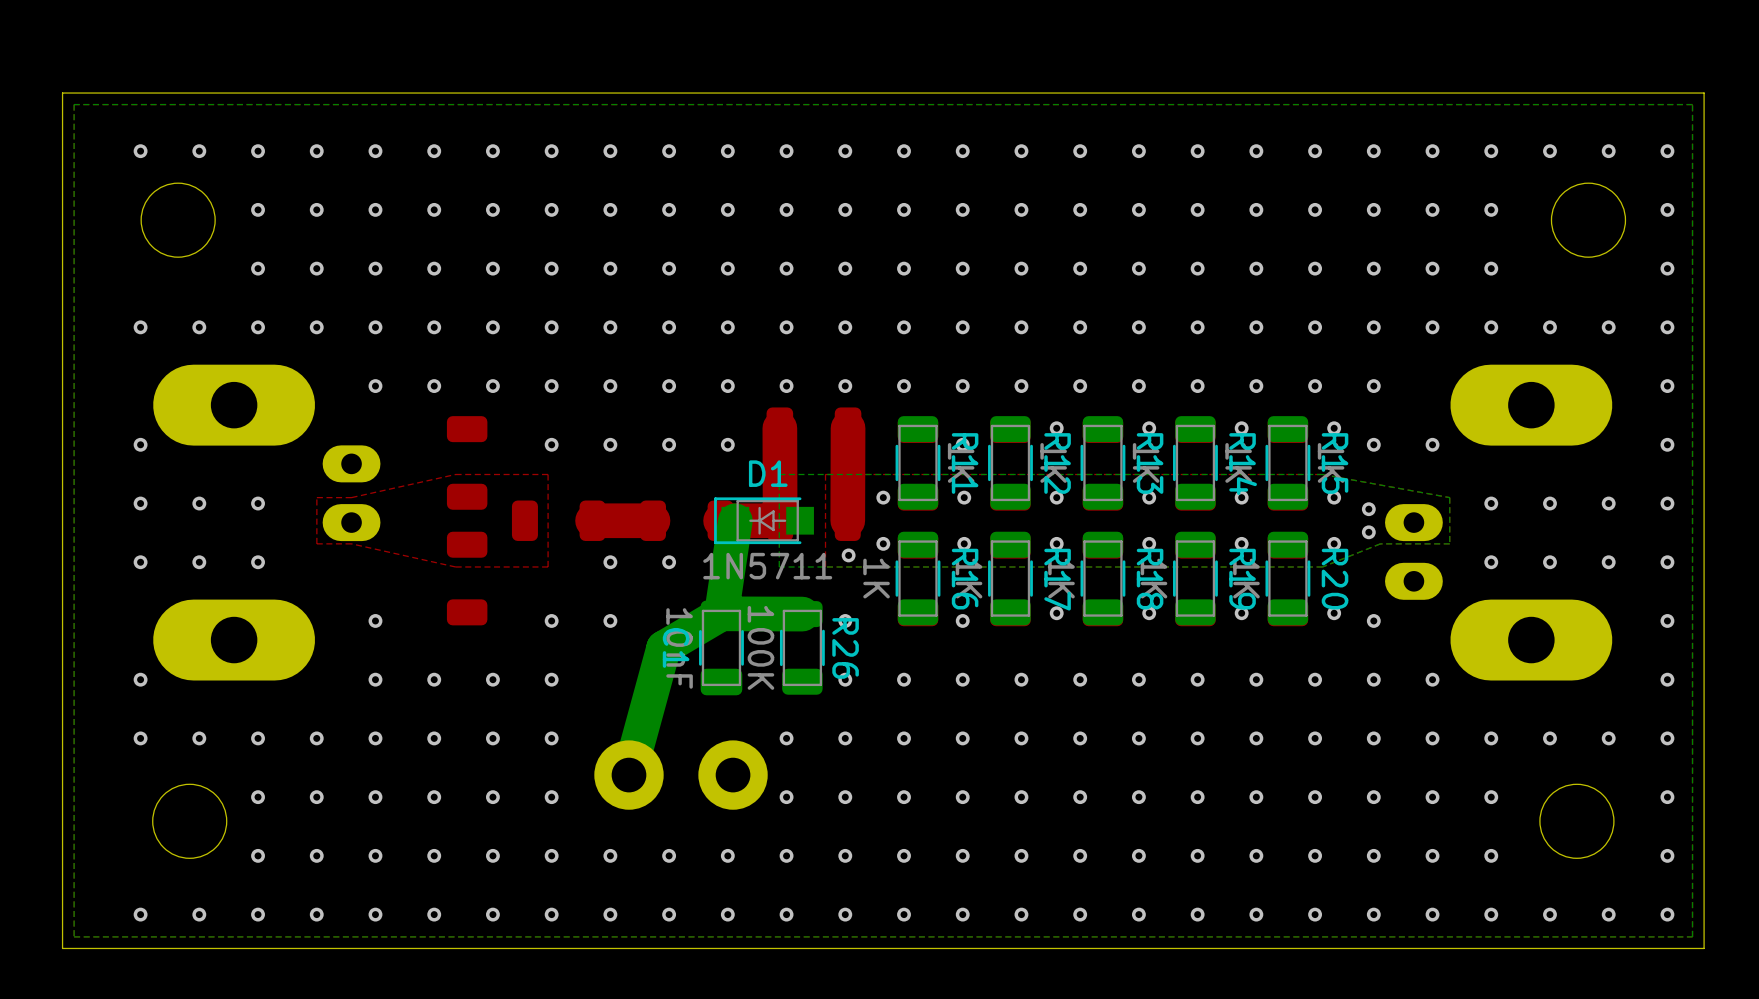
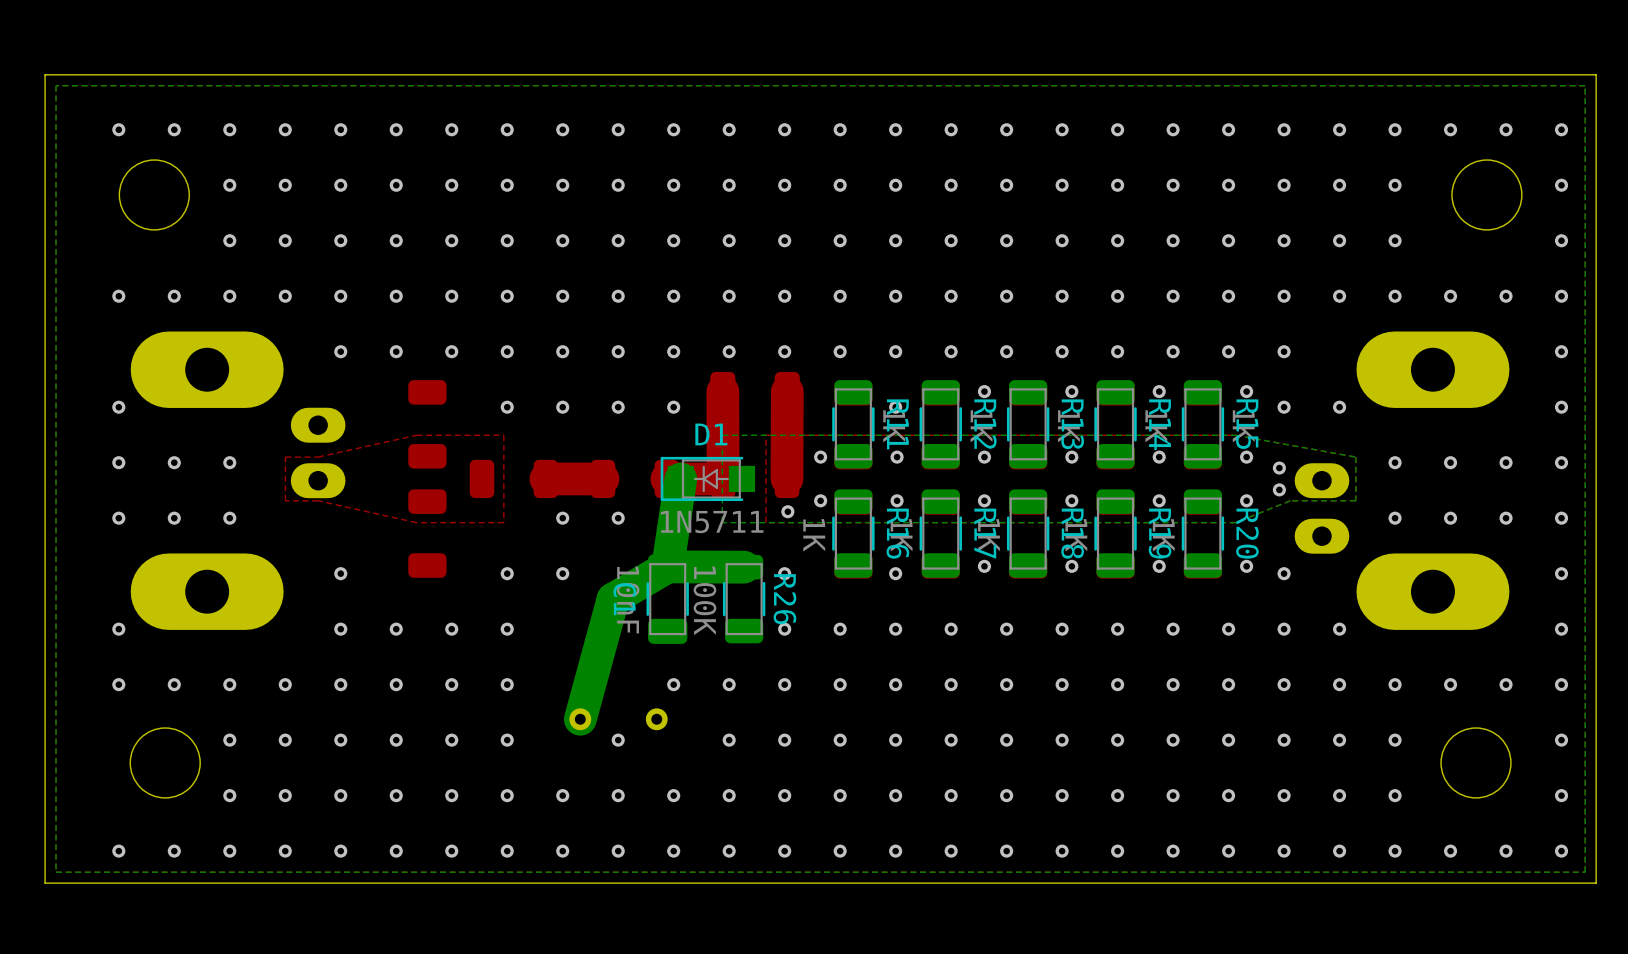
via: none -> (673, 684)
part footprint: [594, 740, 664, 810] -> [569, 708, 592, 731]
part footprint: [698, 740, 768, 810] -> [645, 708, 668, 731]
via: none -> (618, 740)

